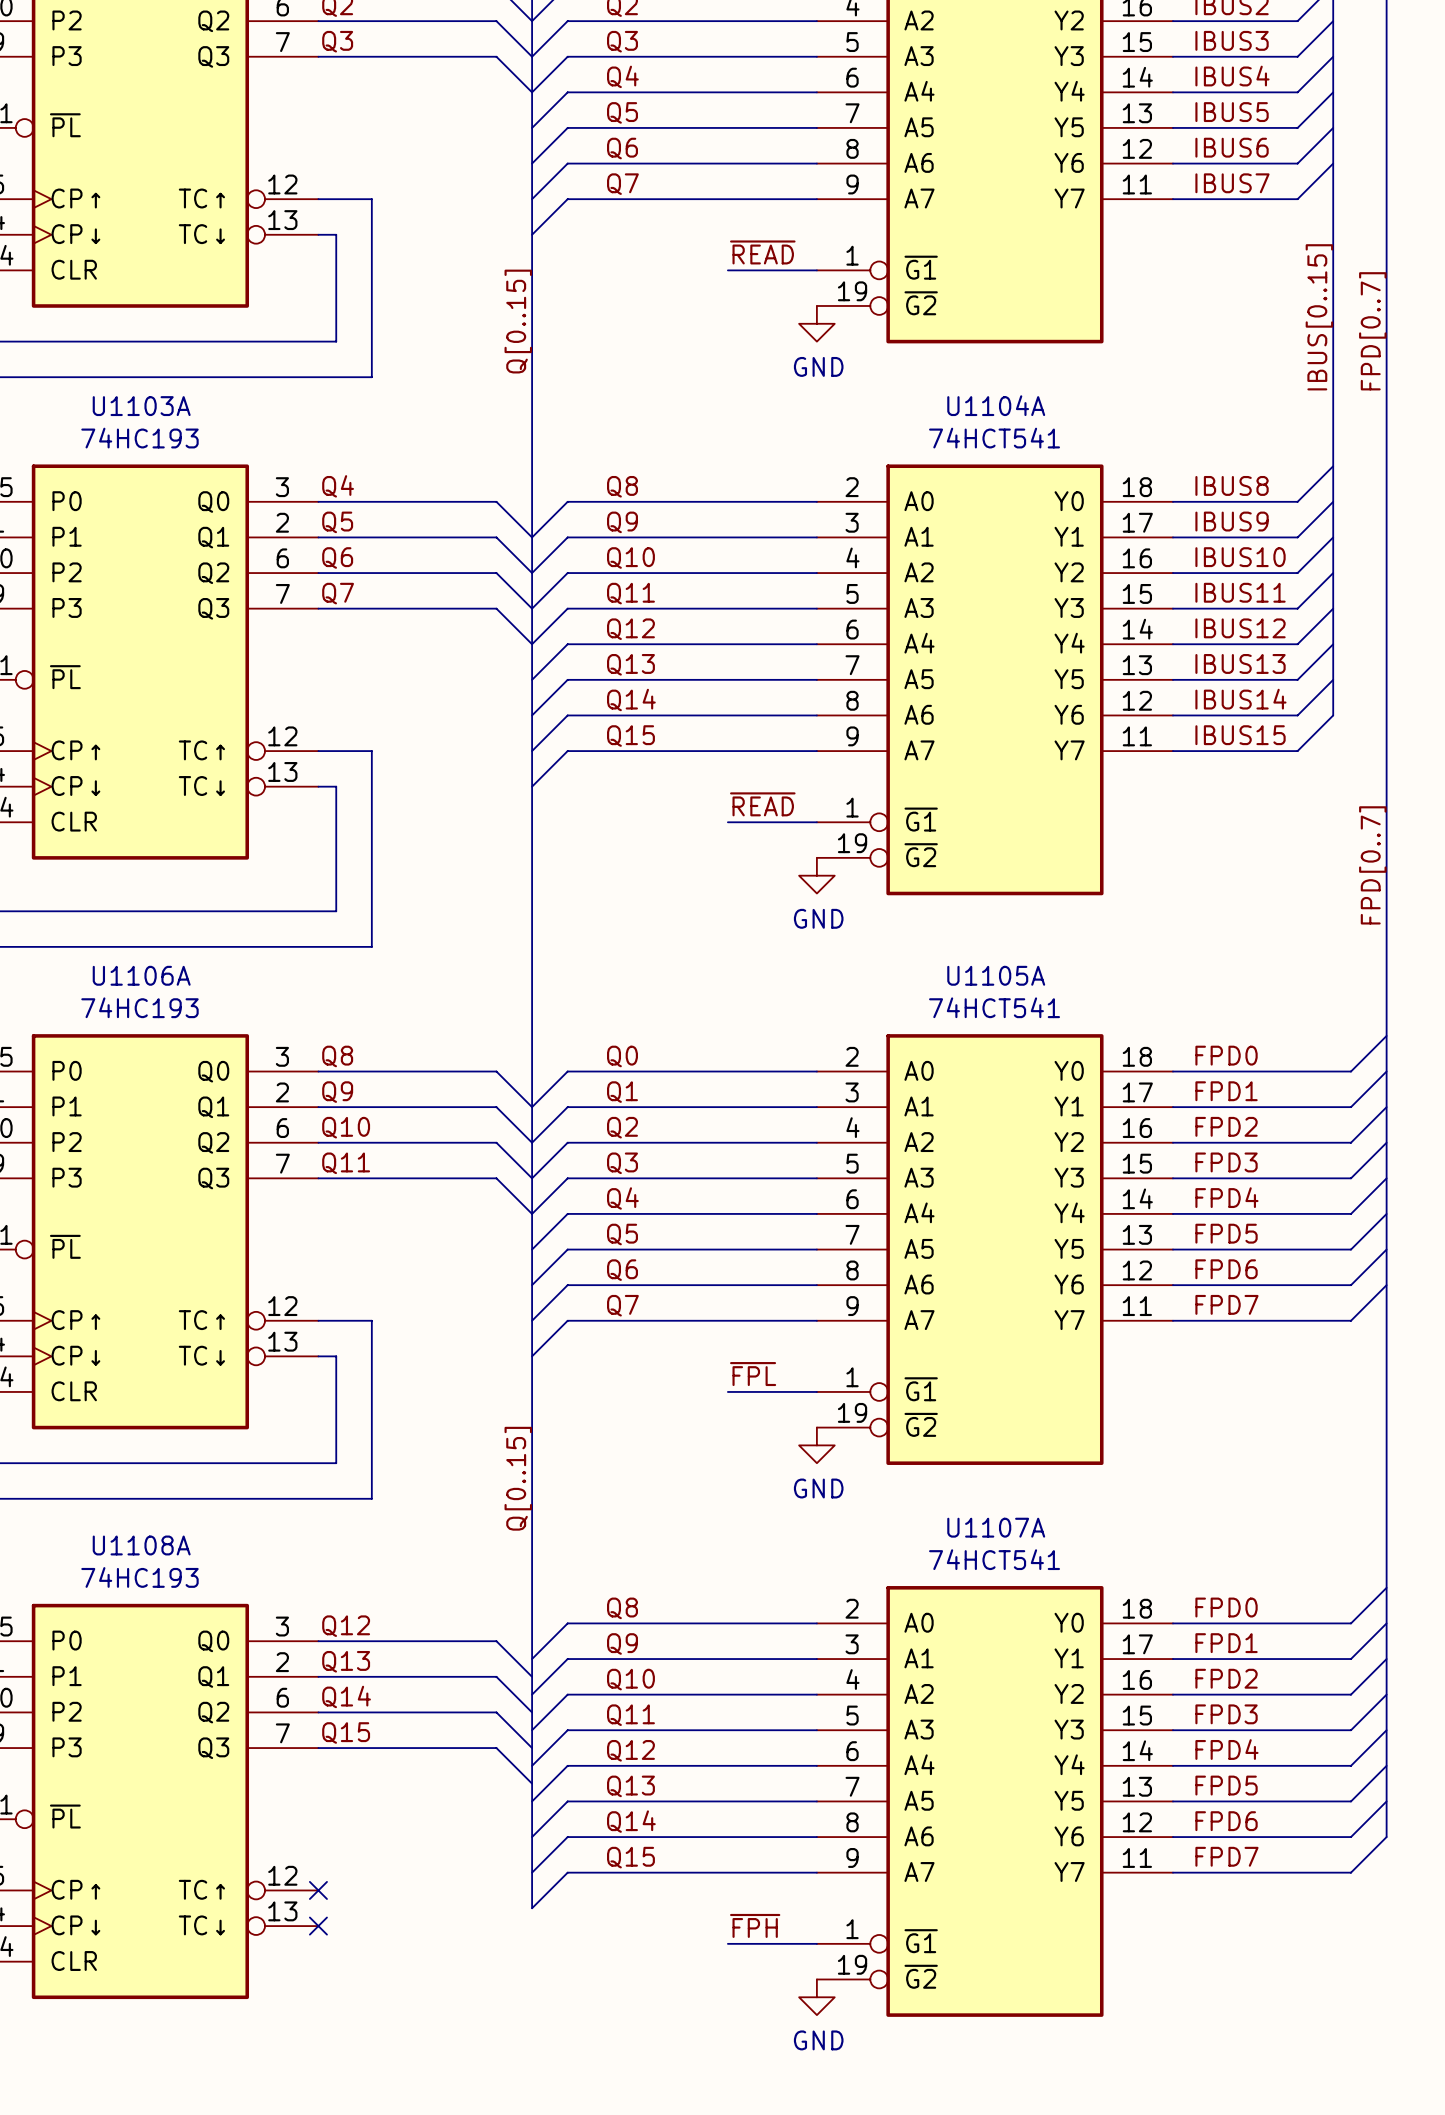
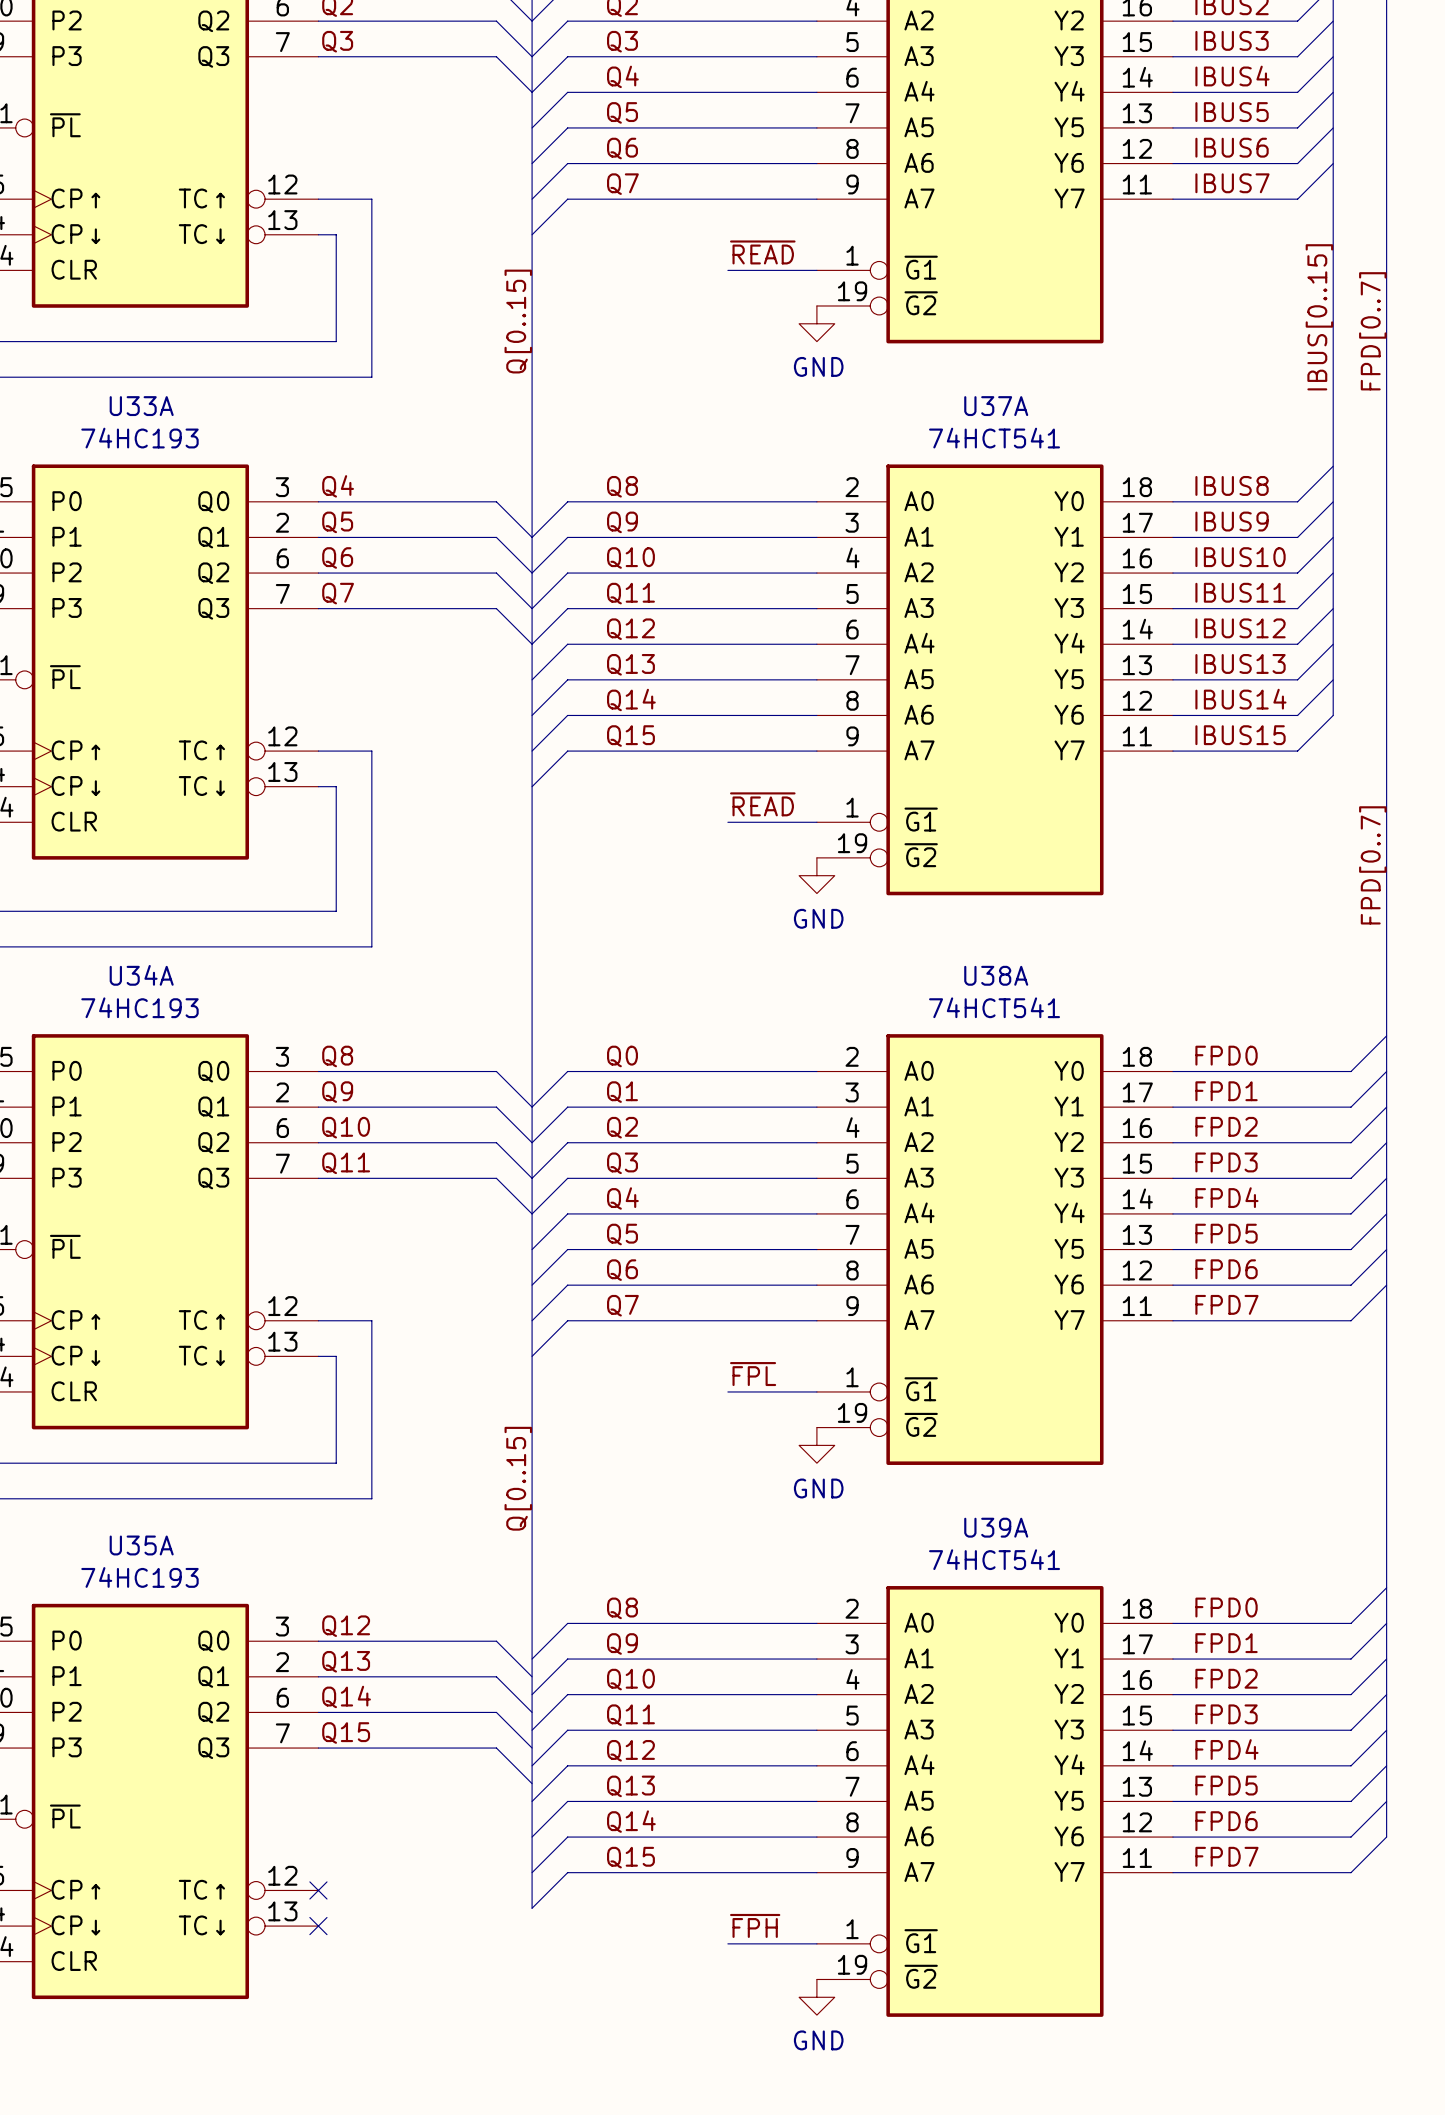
U1104A name: U1104A (996, 405) -> U37A (996, 406)
U1103A name: U1103A (141, 406) -> U33A (141, 406)
U1106A name: U1106A (141, 975) -> U34A (141, 975)
U1105A name: U1105A (996, 975) -> U38A (996, 975)
U1107A name: U1107A (996, 1527) -> U39A (996, 1527)
U1108A name: U1108A (141, 1545) -> U35A (141, 1545)

